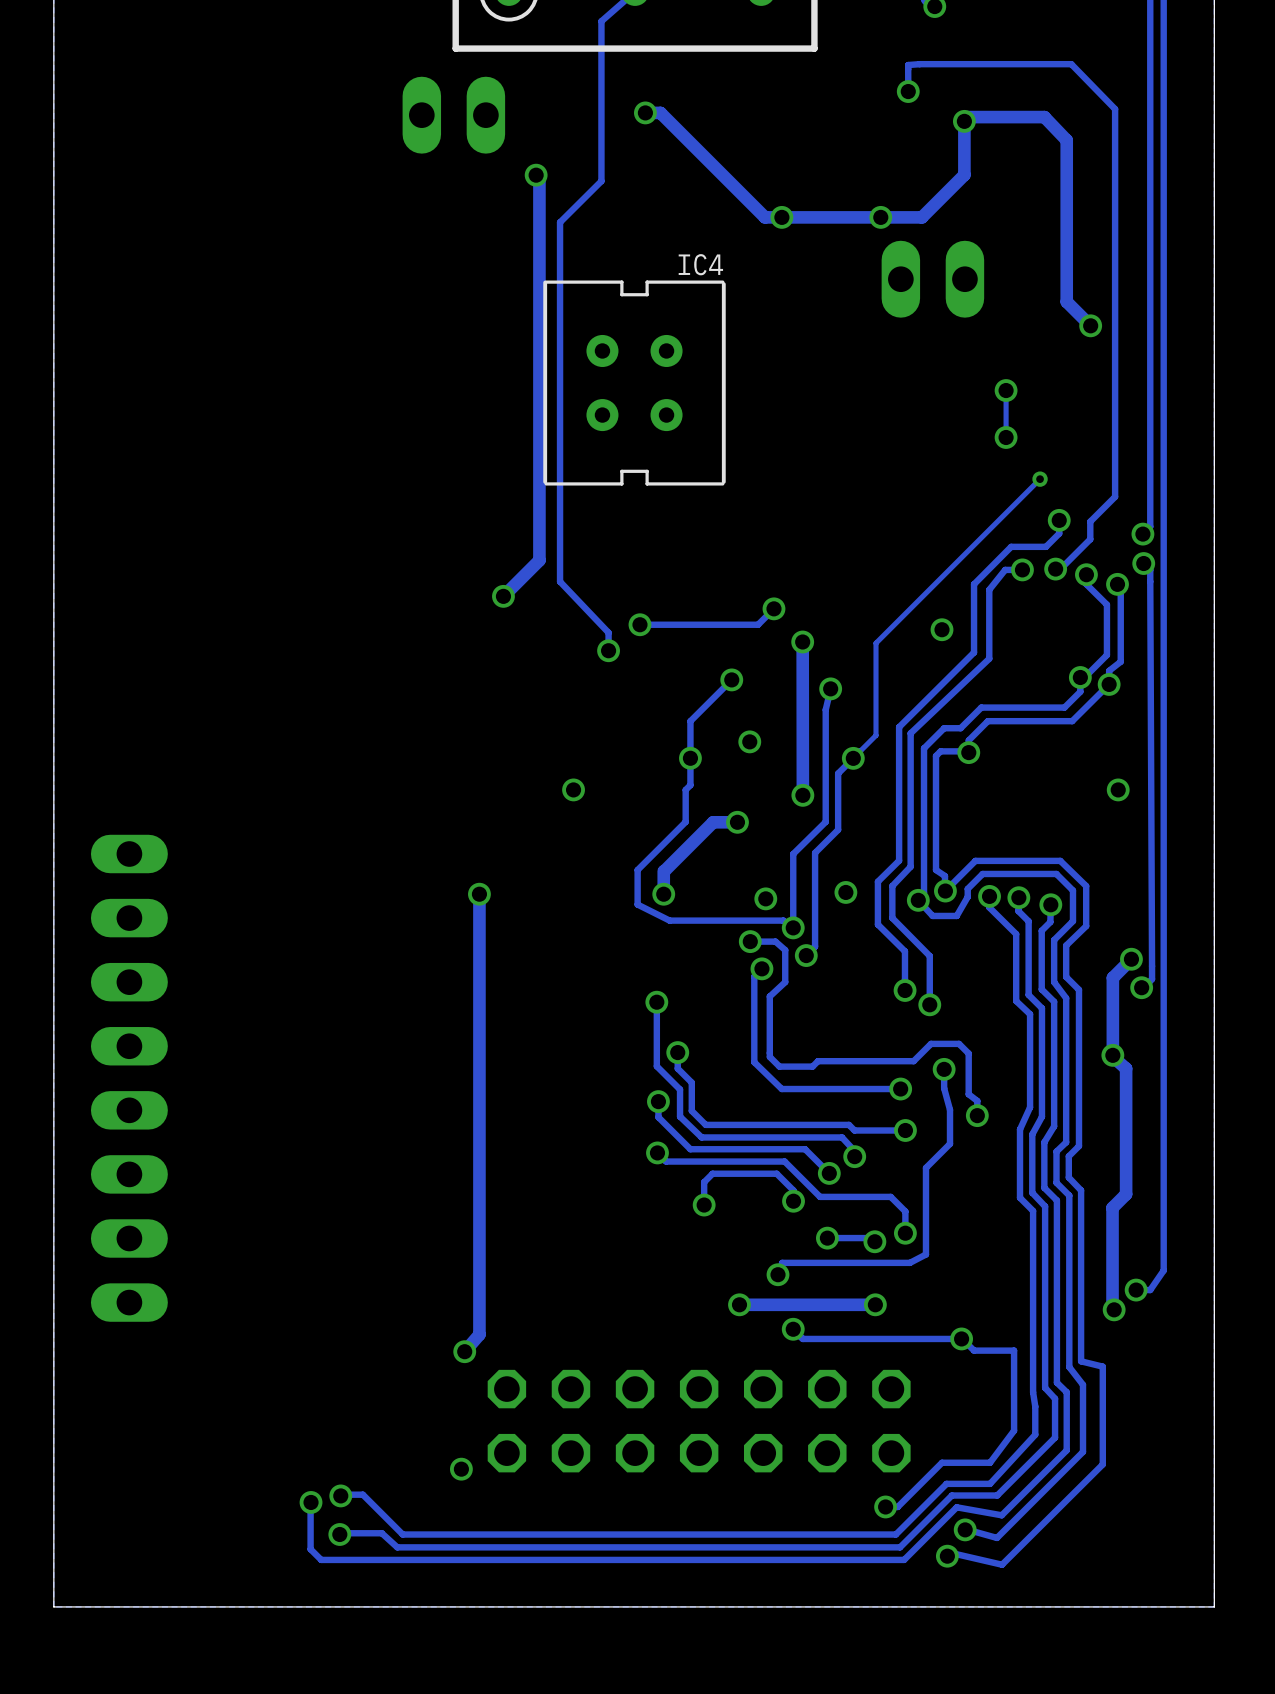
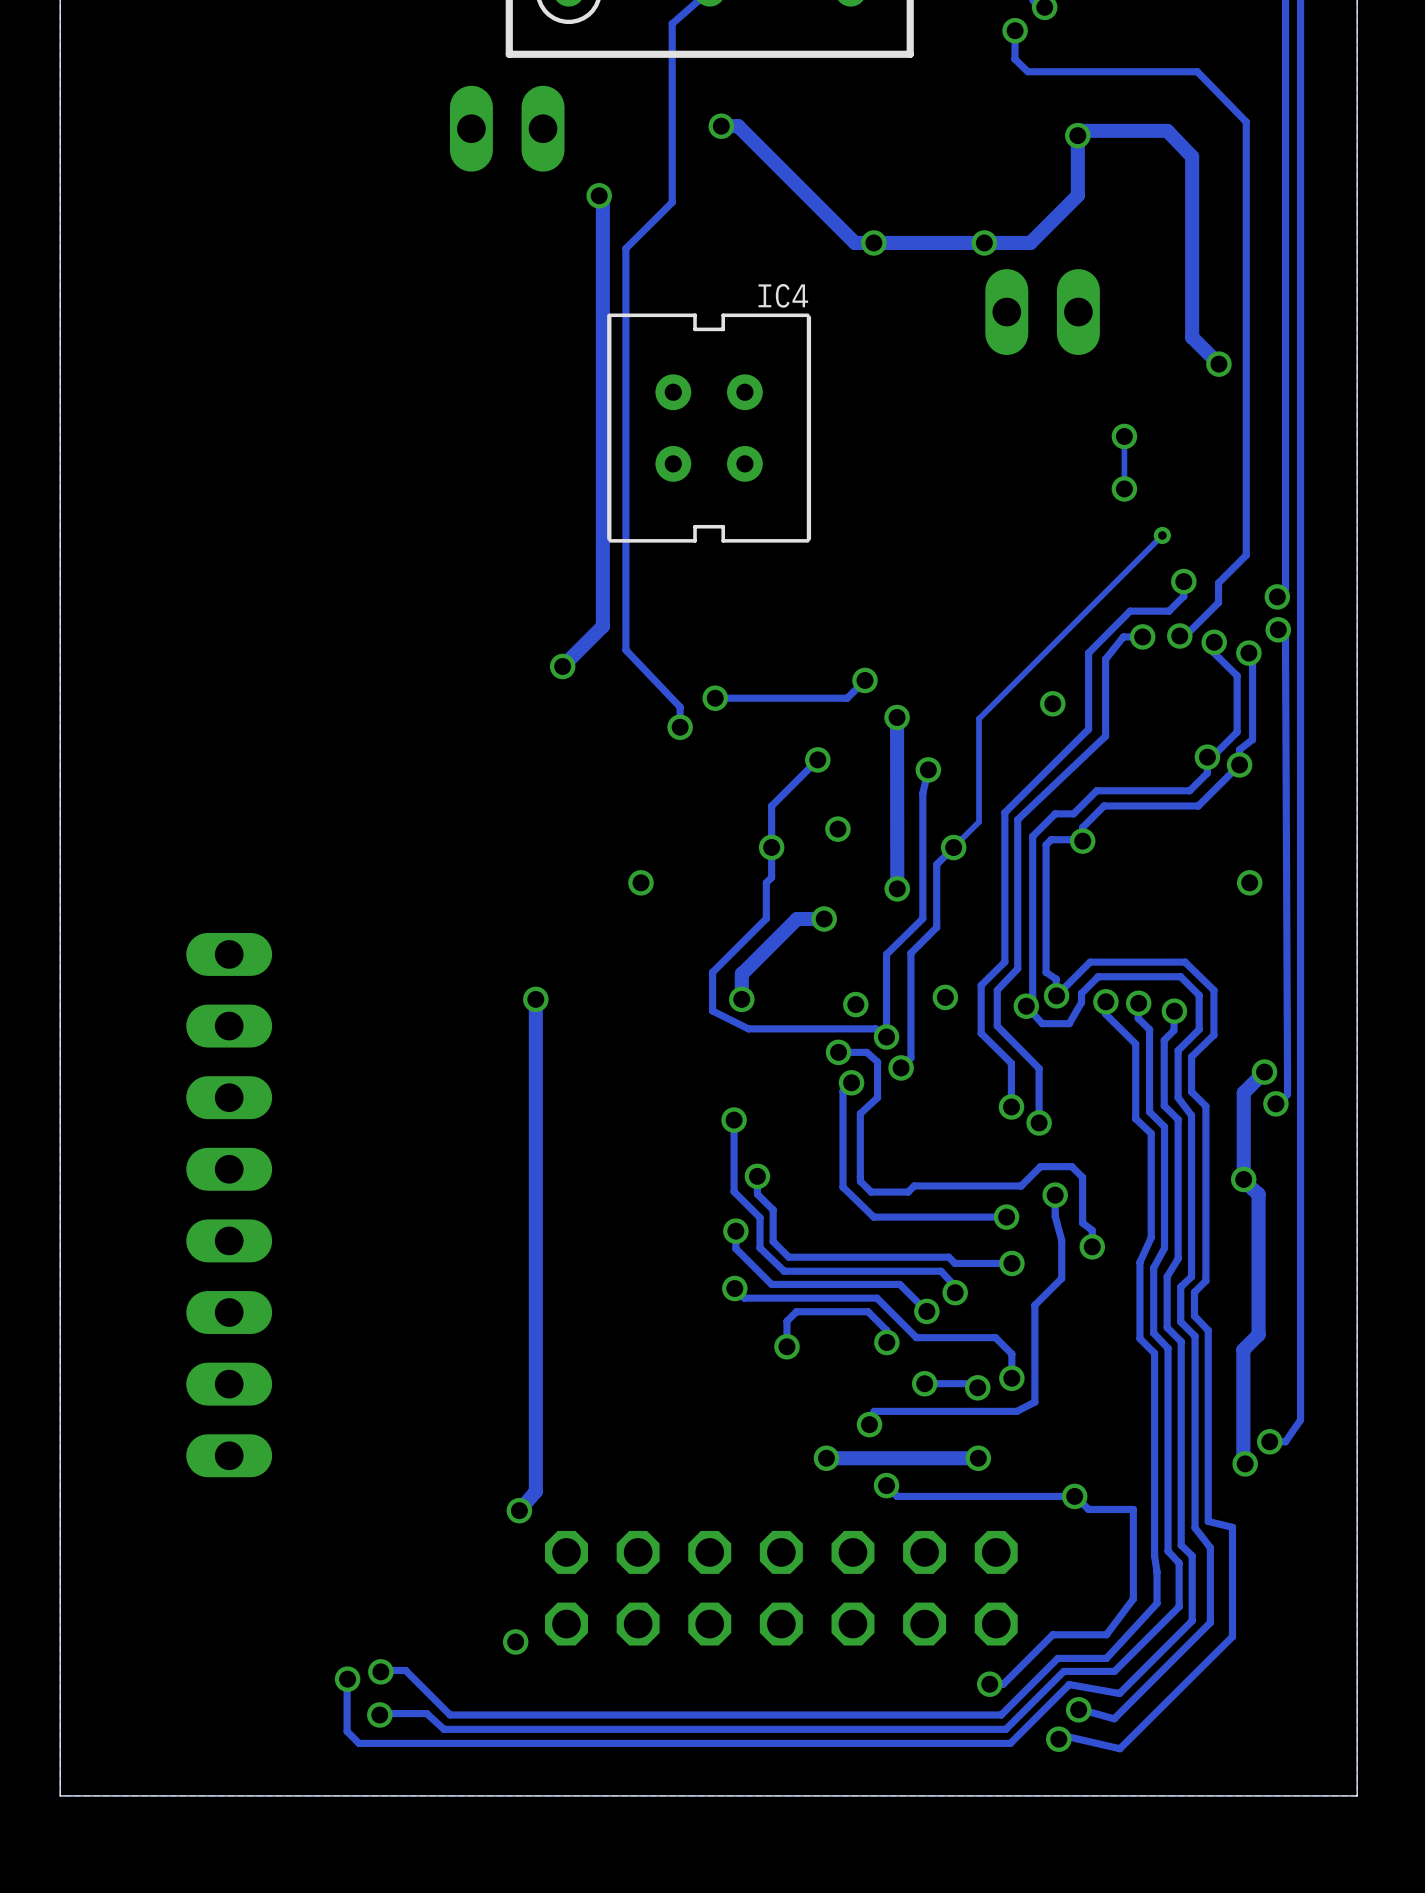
track: (919, 64) (908, 65) (908, 91) -> (1027, 71) (1015, 59) (1015, 30)
via position: (908, 91) -> (1015, 30)
part position: (129, 1078) -> (229, 1205)

